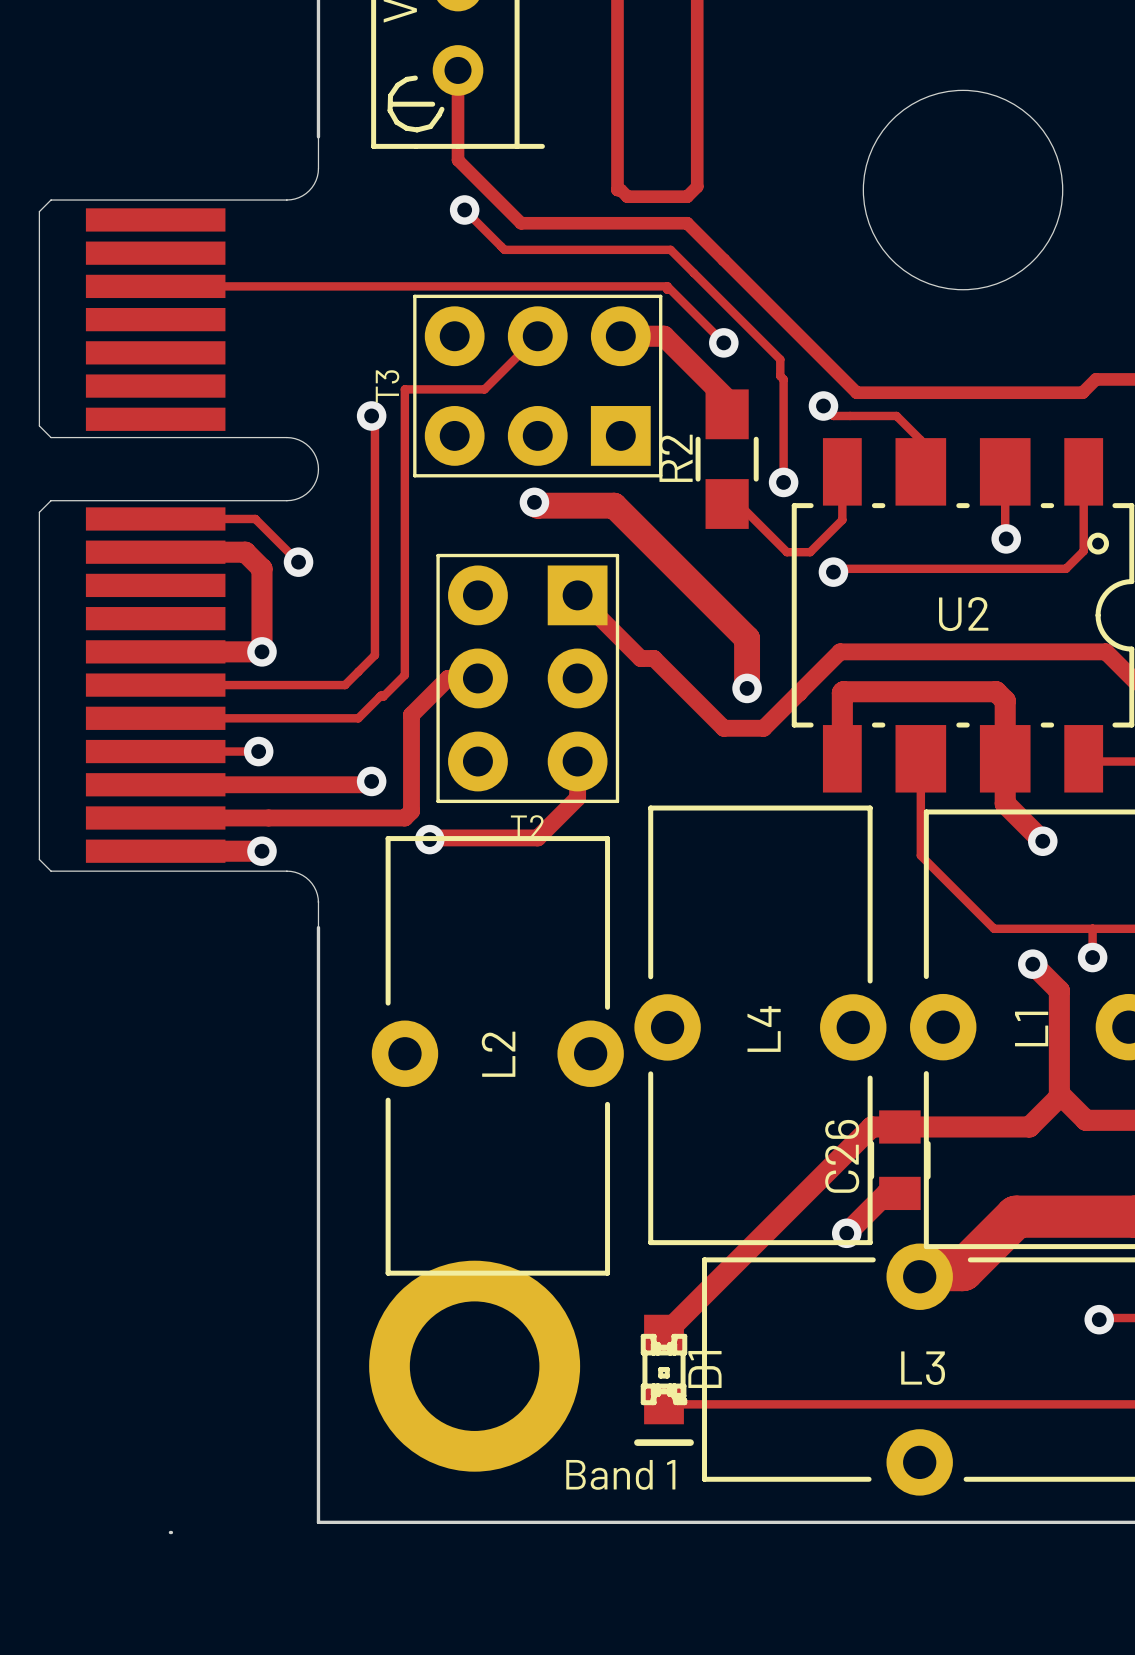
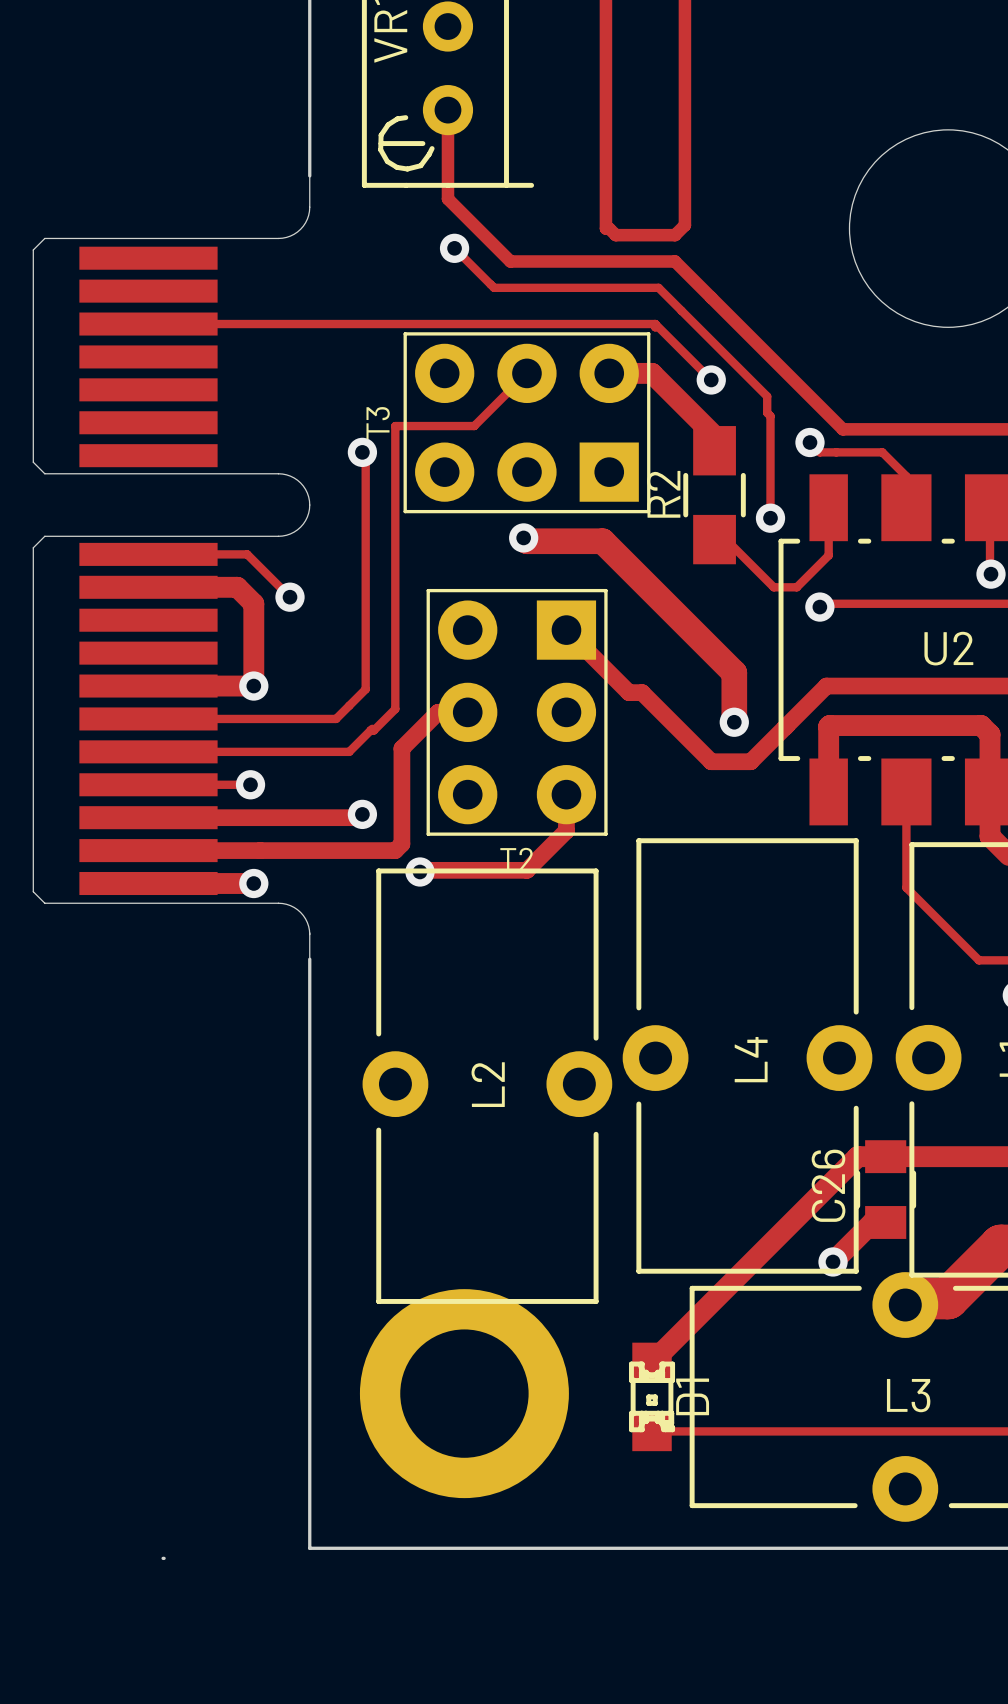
line: (637, 1442) (690, 1442) -> none
text: Band 1 (620, 1474) -> none

